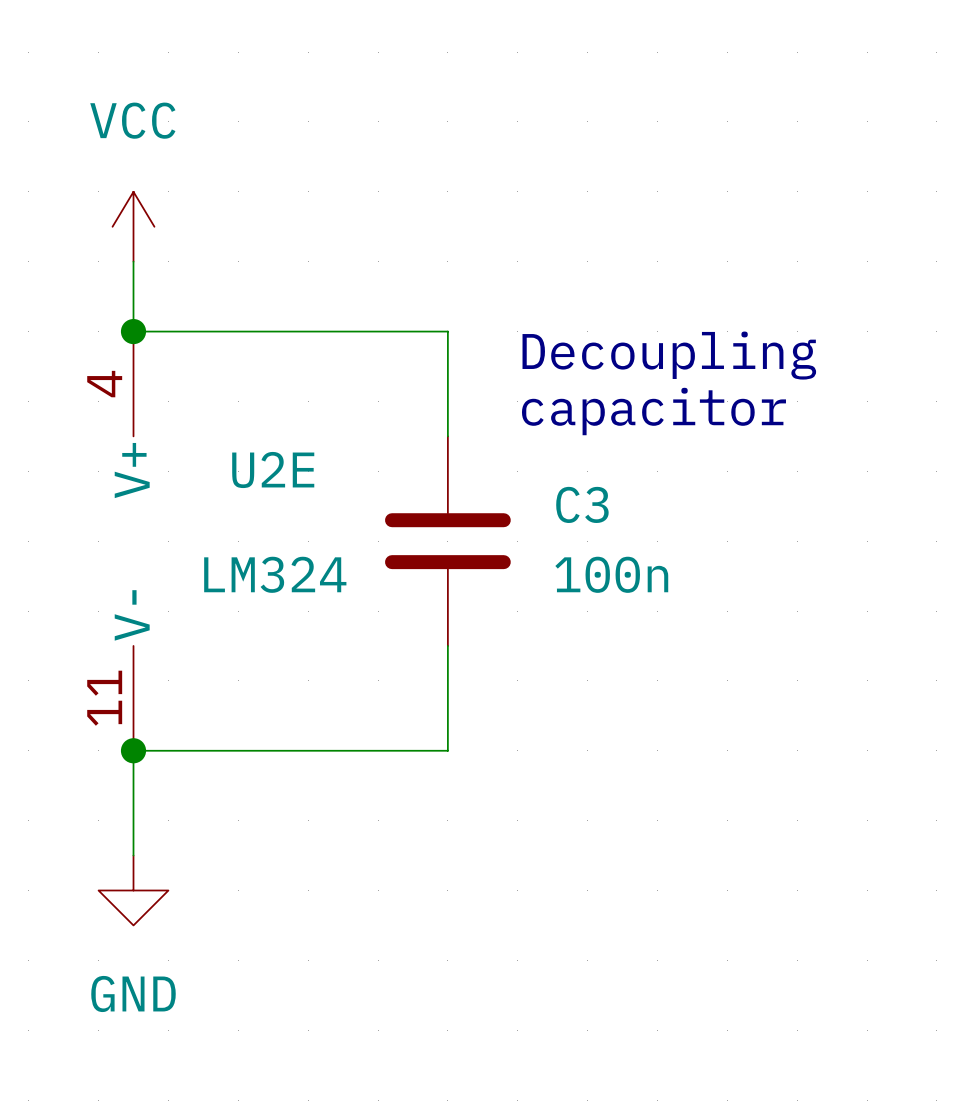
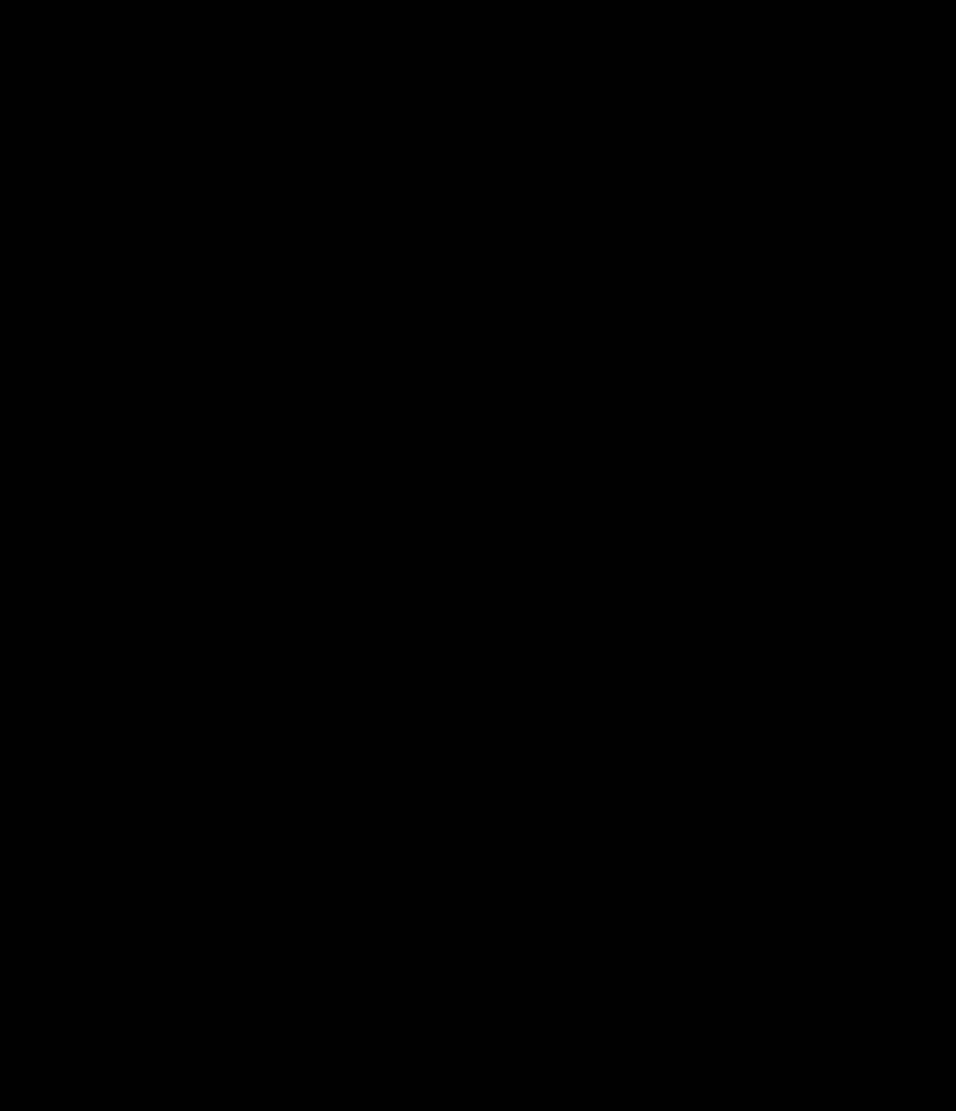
power symbol: VCC (133, 226) -> none
wire: (133, 261) (133, 331) (447, 331) (447, 436) -> none
junction: (133, 331) -> none
text: Decoupling (669, 355) -> none
text: capacitor (653, 411) -> none
U2E: LM324 (133, 541) -> none
C3: 100n (447, 541) -> none
wire: (447, 645) (447, 750) (133, 750) (133, 855) -> none
junction: (133, 750) -> none
power symbol: GND (133, 890) -> none

